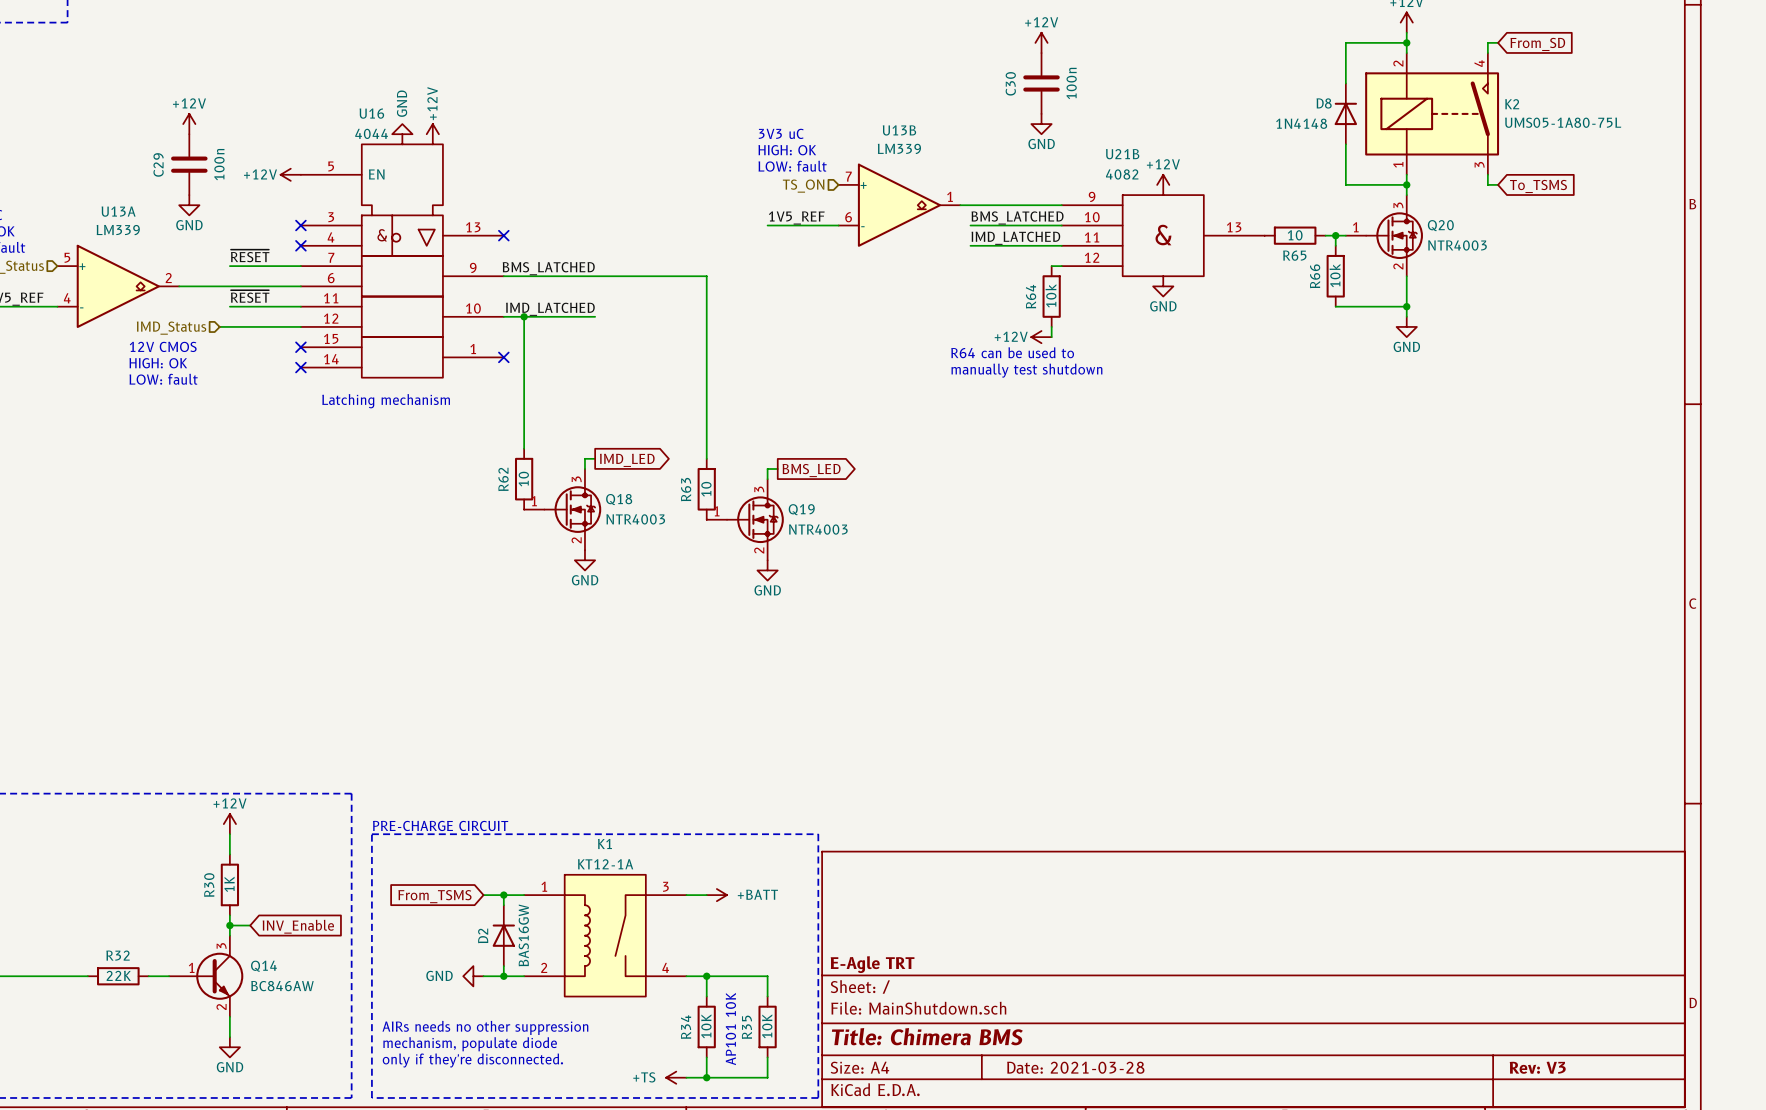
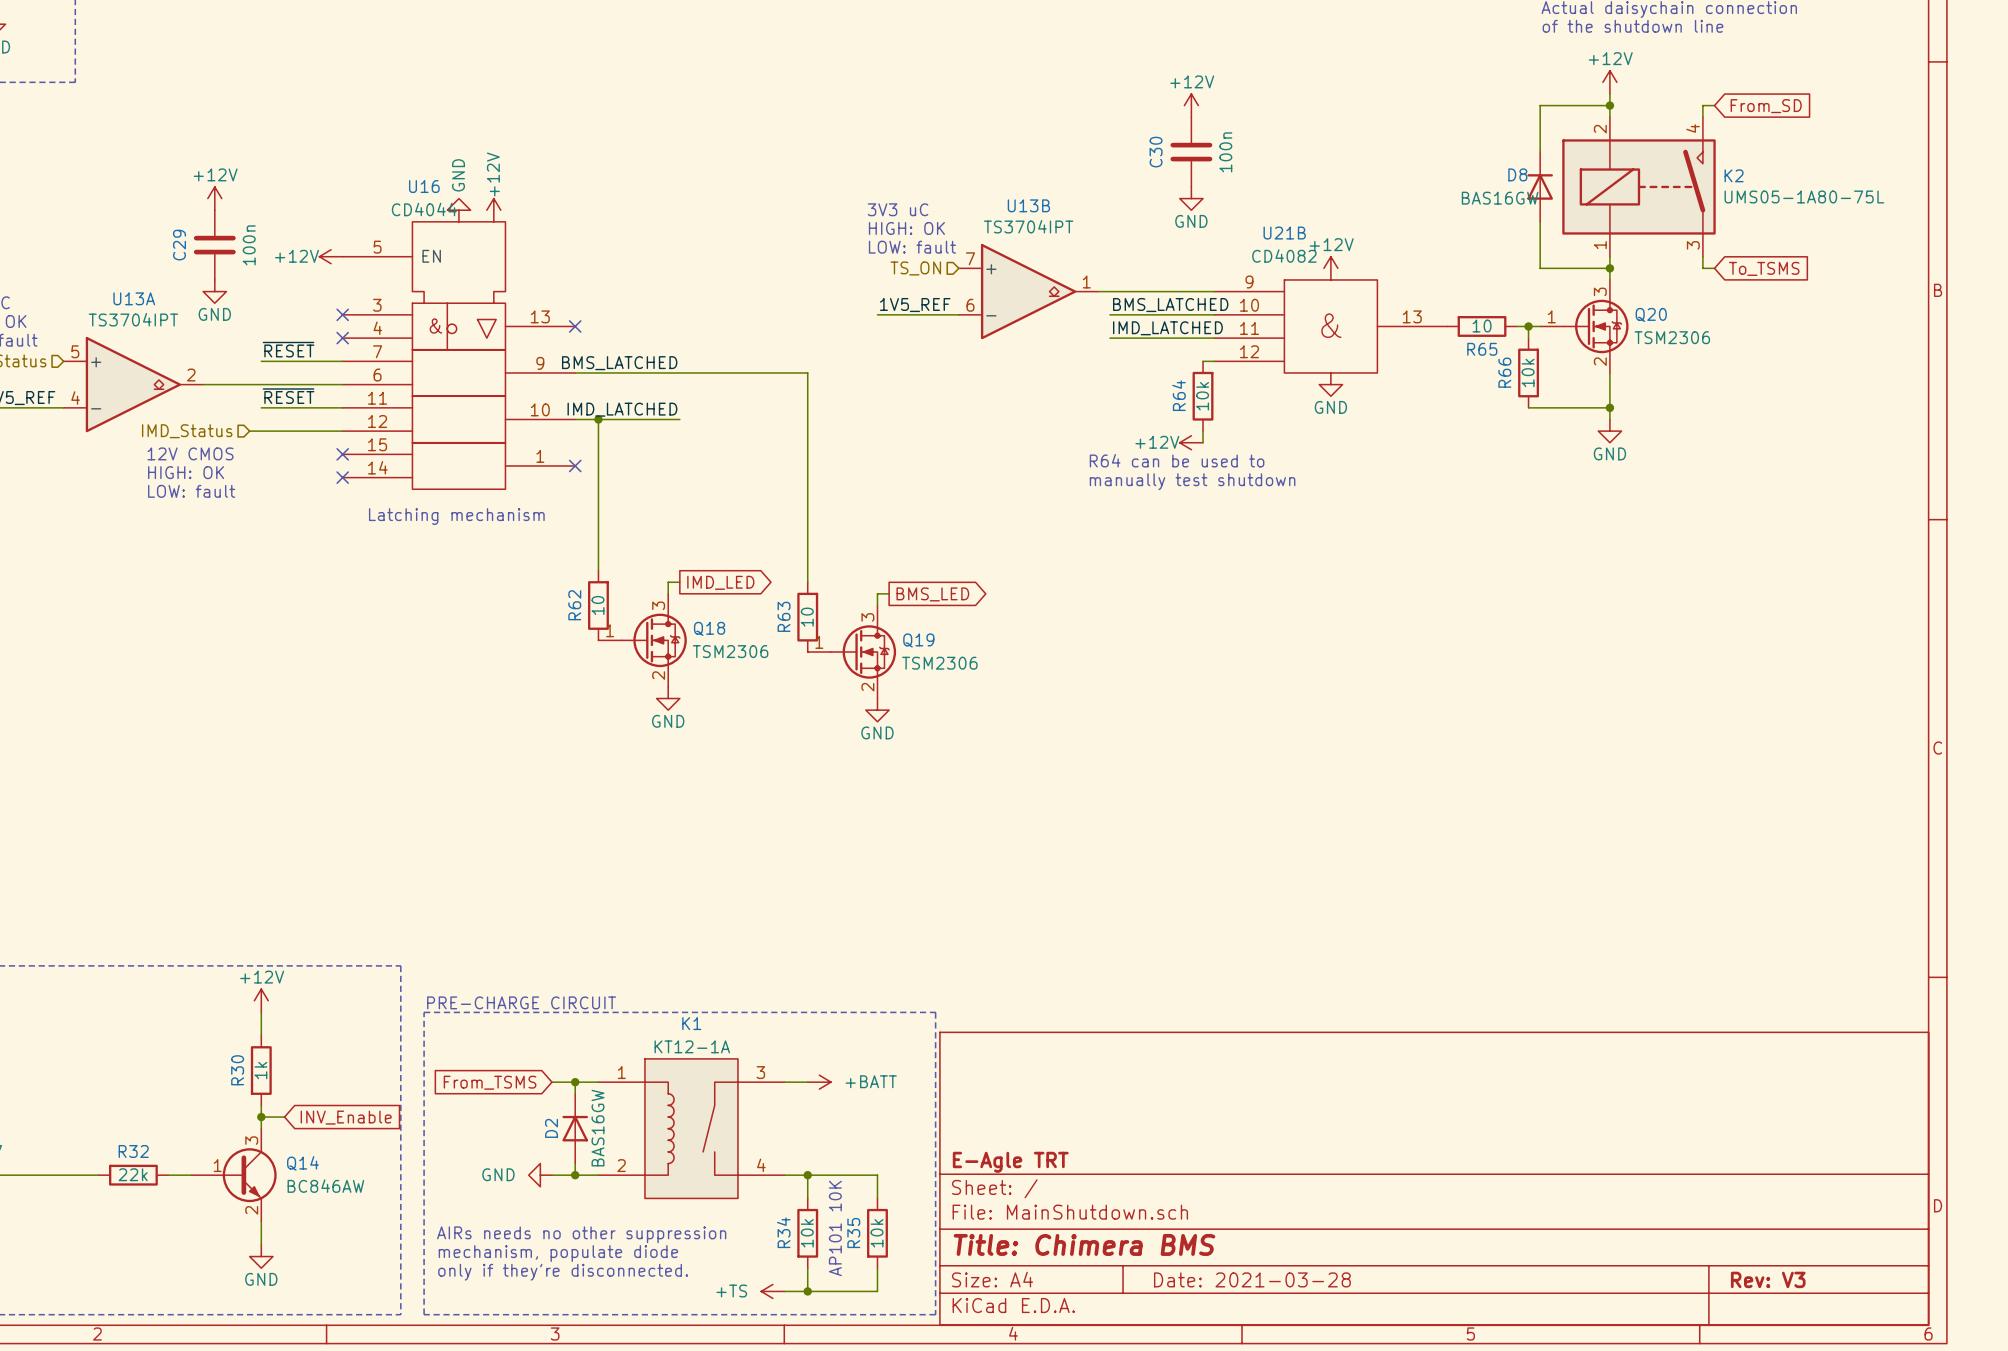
D8 value: 1N4148 (1301, 123) -> BAS16GW (1500, 198)
U16 value: 4044 (371, 133) -> CD4044 (424, 209)
U13B value: LM339 (899, 148) -> TS3704IPT (1028, 226)
U21B value: 4082 (1122, 174) -> CD4082 (1284, 256)
U13A value: LM339 (118, 230) -> TS3704IPT (133, 319)
Q20 value: NTR4003 (1457, 245) -> TSM2306 (1672, 337)
Q18 value: NTR4003 (635, 519) -> TSM2306 (730, 651)
Q19 value: NTR4003 (818, 529) -> TSM2306 (939, 663)
R30 value: 1K (229, 884) -> 1k (260, 1070)
R32 value: 22K (118, 975) -> 22k (133, 1174)
R34 value: 10K (706, 1026) -> 10k (807, 1233)
R35 value: 10K (767, 1026) -> 10k (877, 1233)

